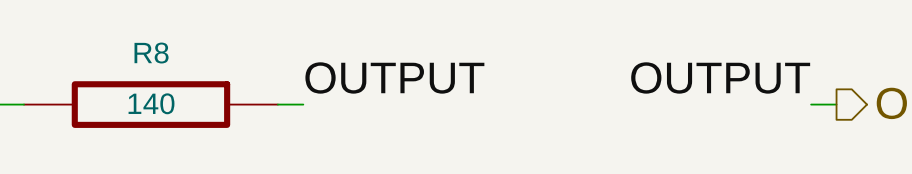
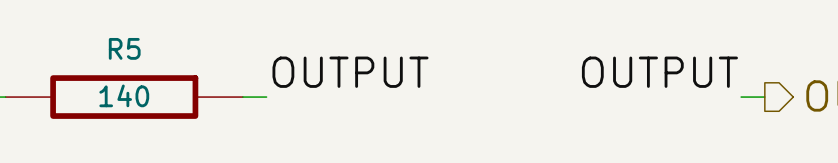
R8 name: R8 (151, 53) -> R5 (124, 48)

